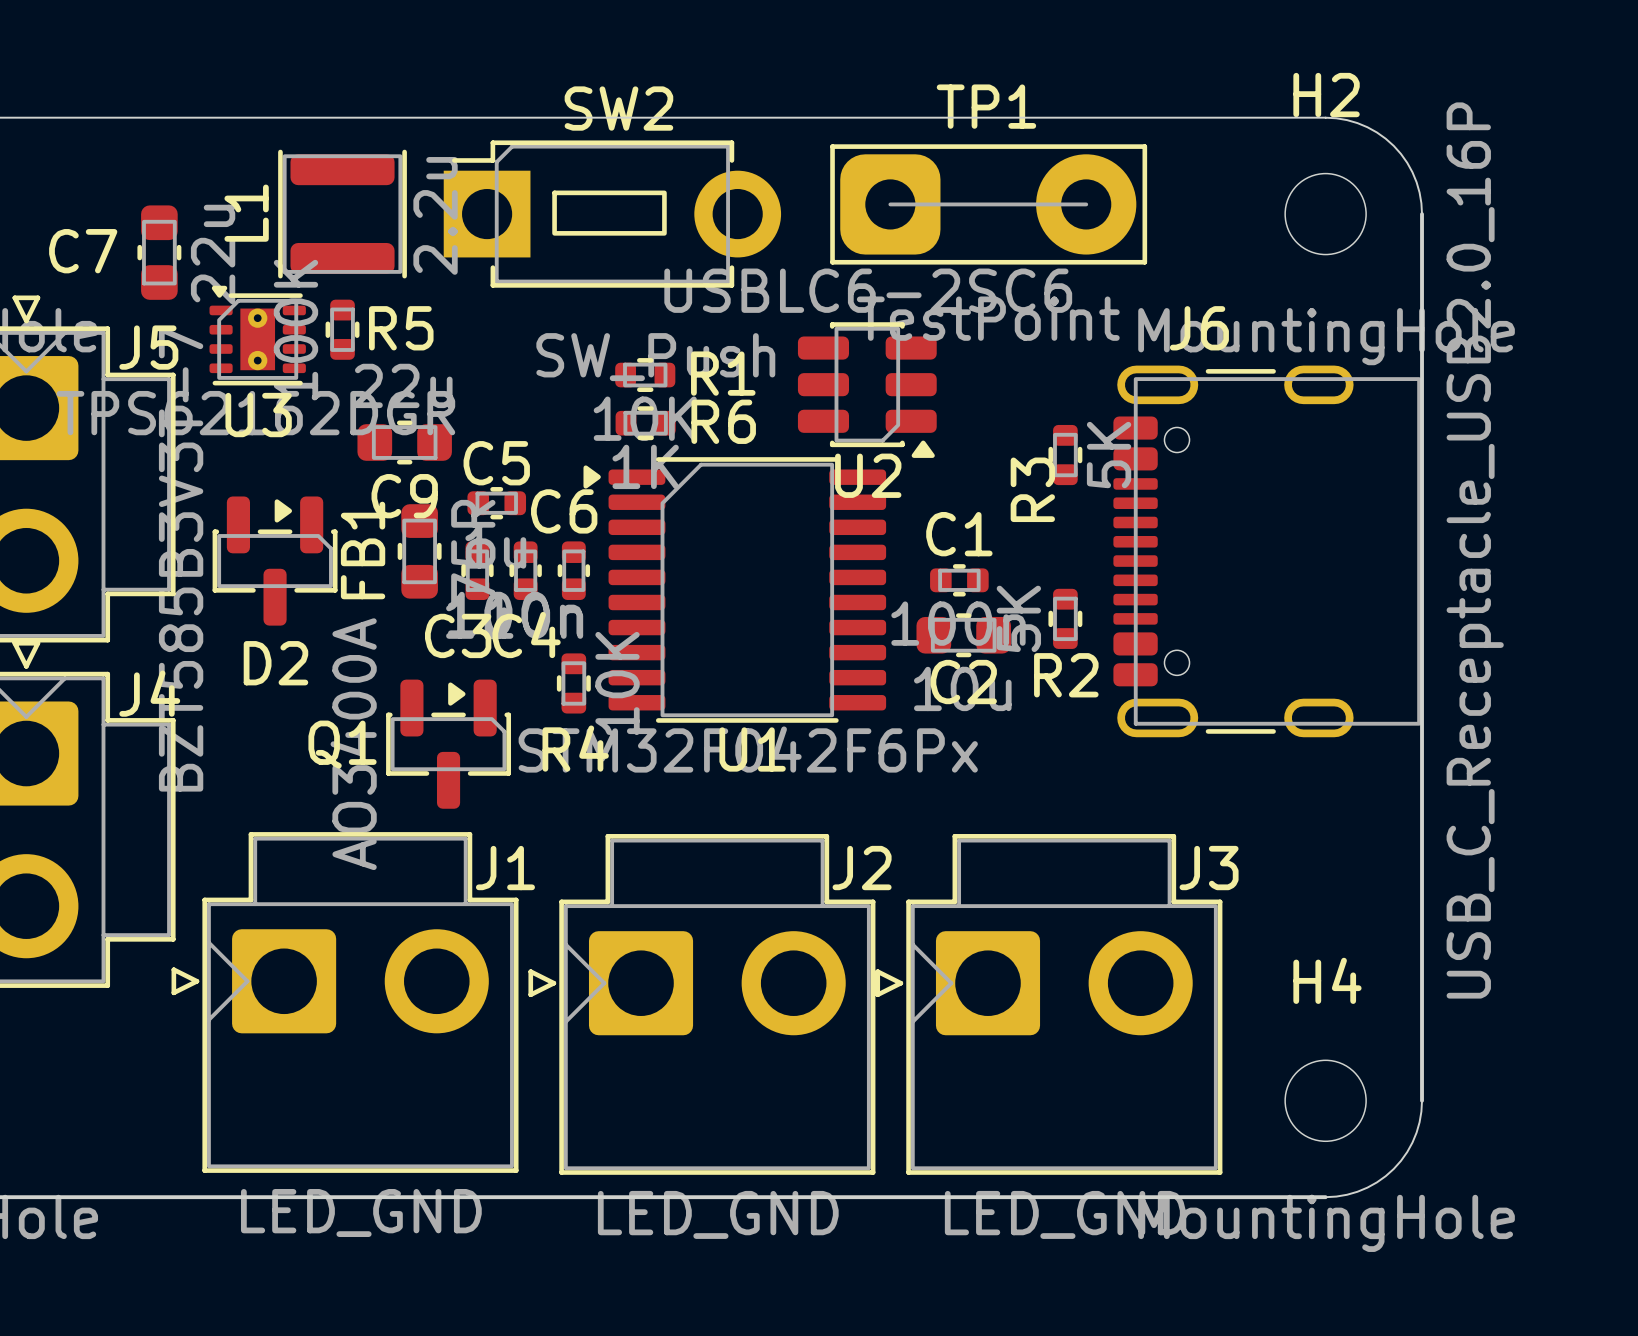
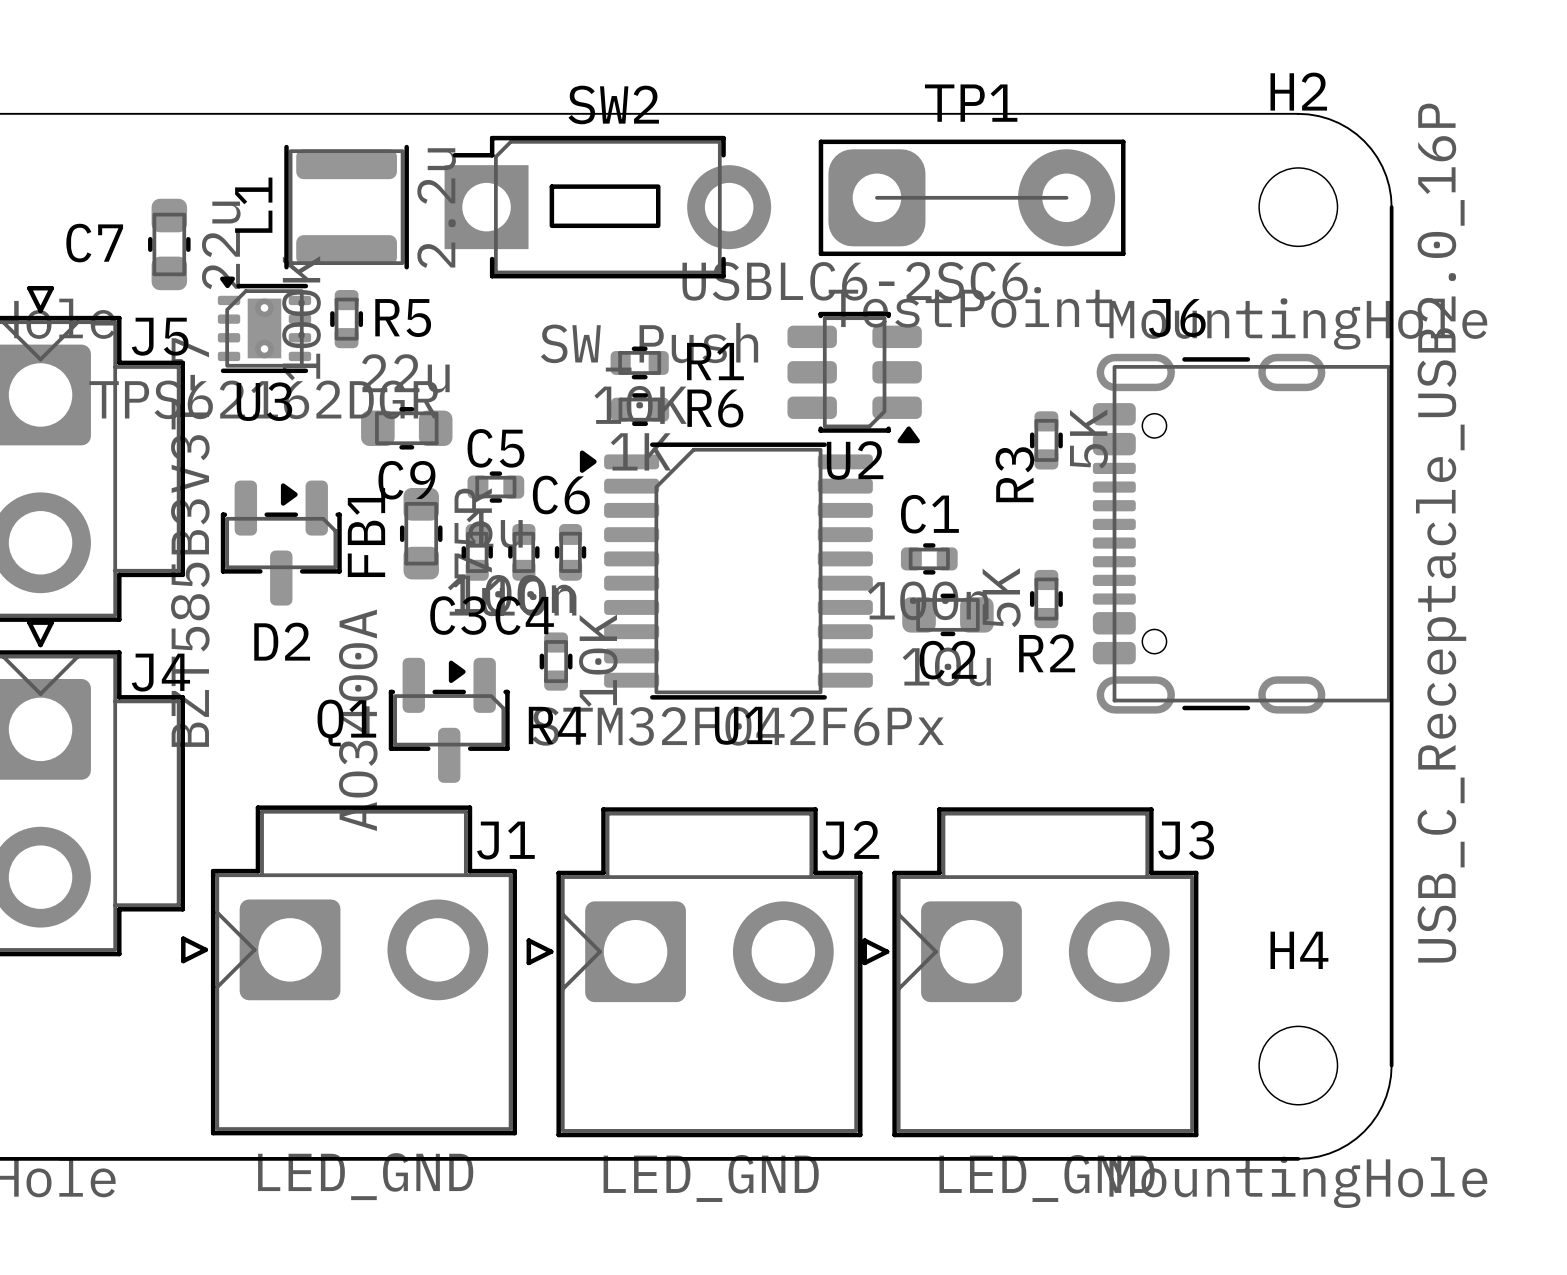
C1 position: (959, 580) -> (929, 558)
R4 position: (573, 683) -> (556, 661)

